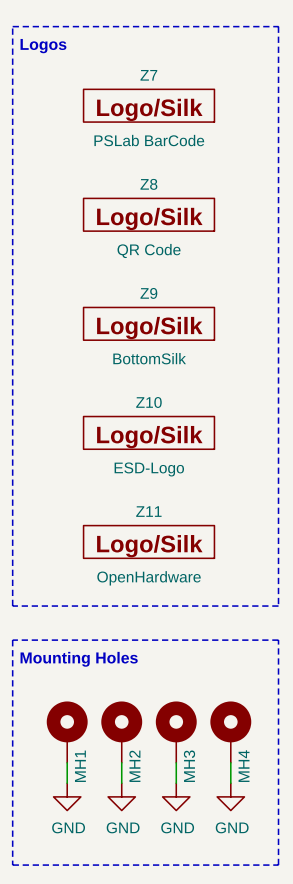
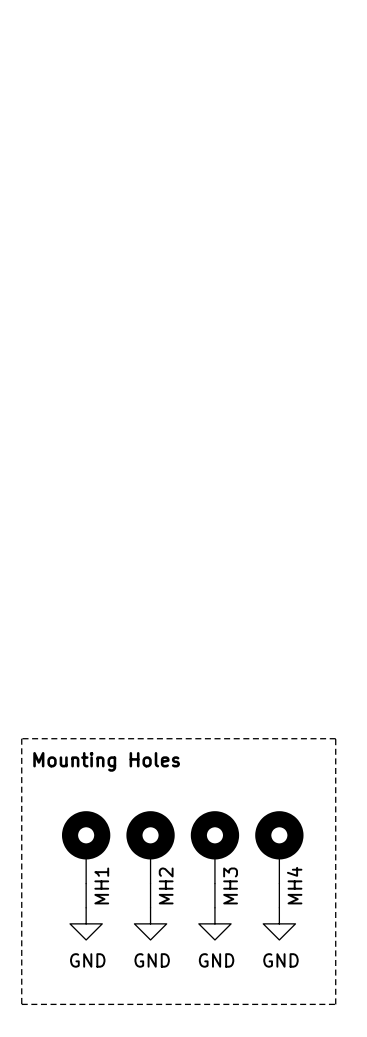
line: (12, 26) (12, 606) (278, 606) (278, 26) (12, 26) -> none
text: Logos (43, 46) -> none
Z7: PSLab BarCode (149, 105) -> none
Z8: QR Code (149, 214) -> none
Z9: BottomSilk (149, 323) -> none
Z10: ESD-Logo (149, 432) -> none
Z11: OpenHardware (149, 541) -> none

